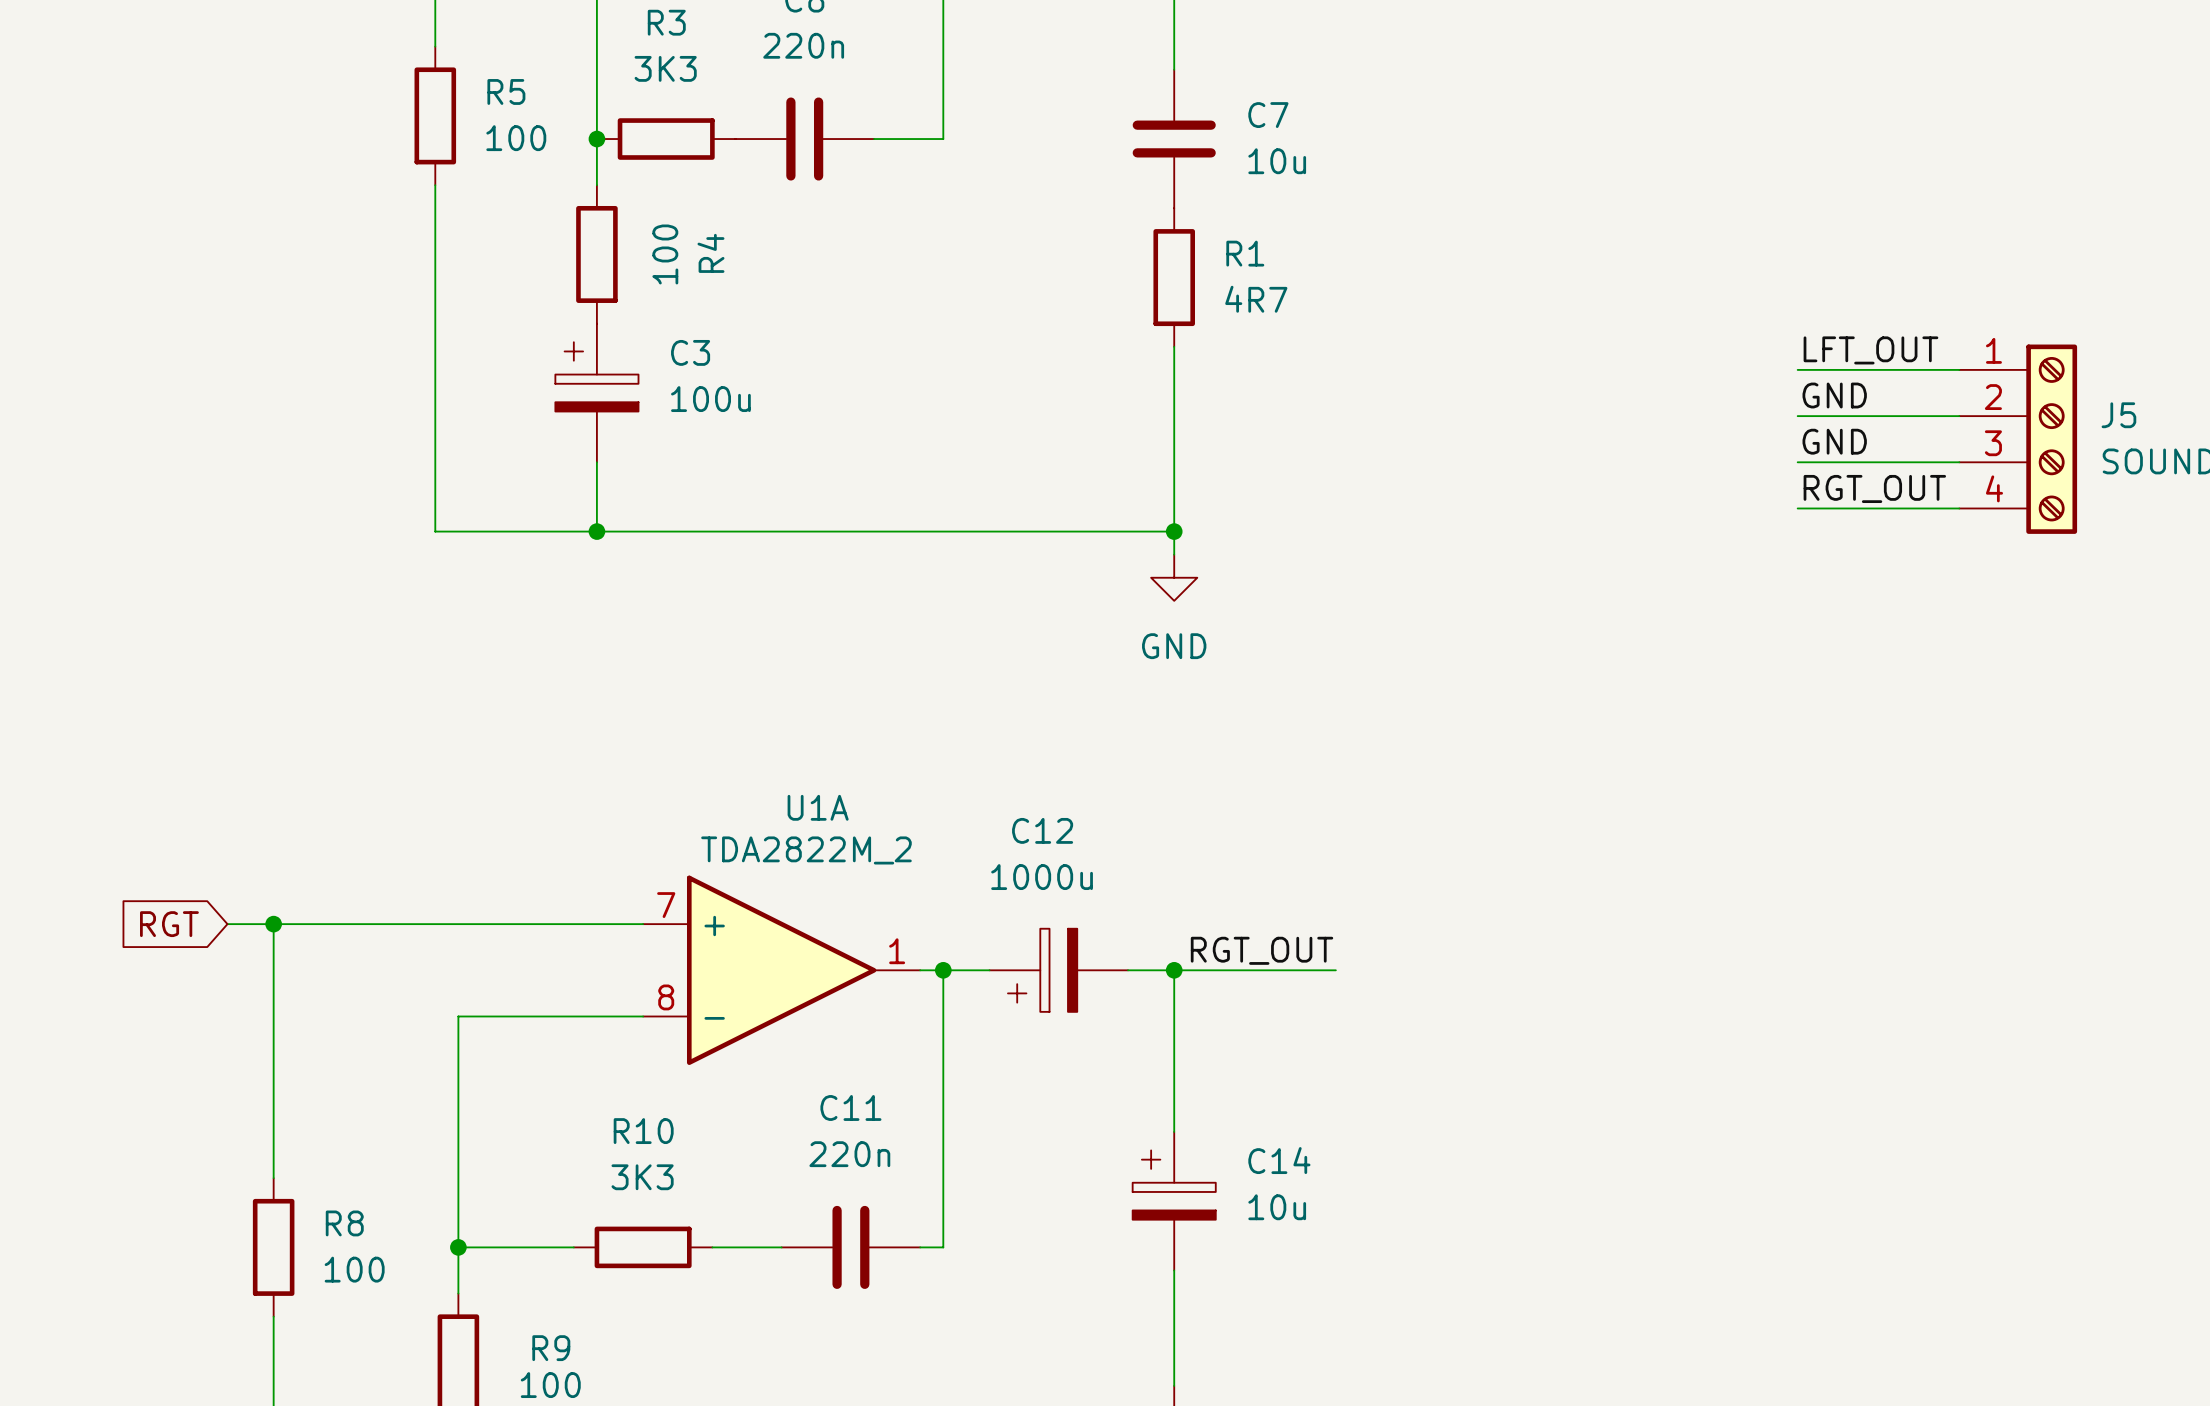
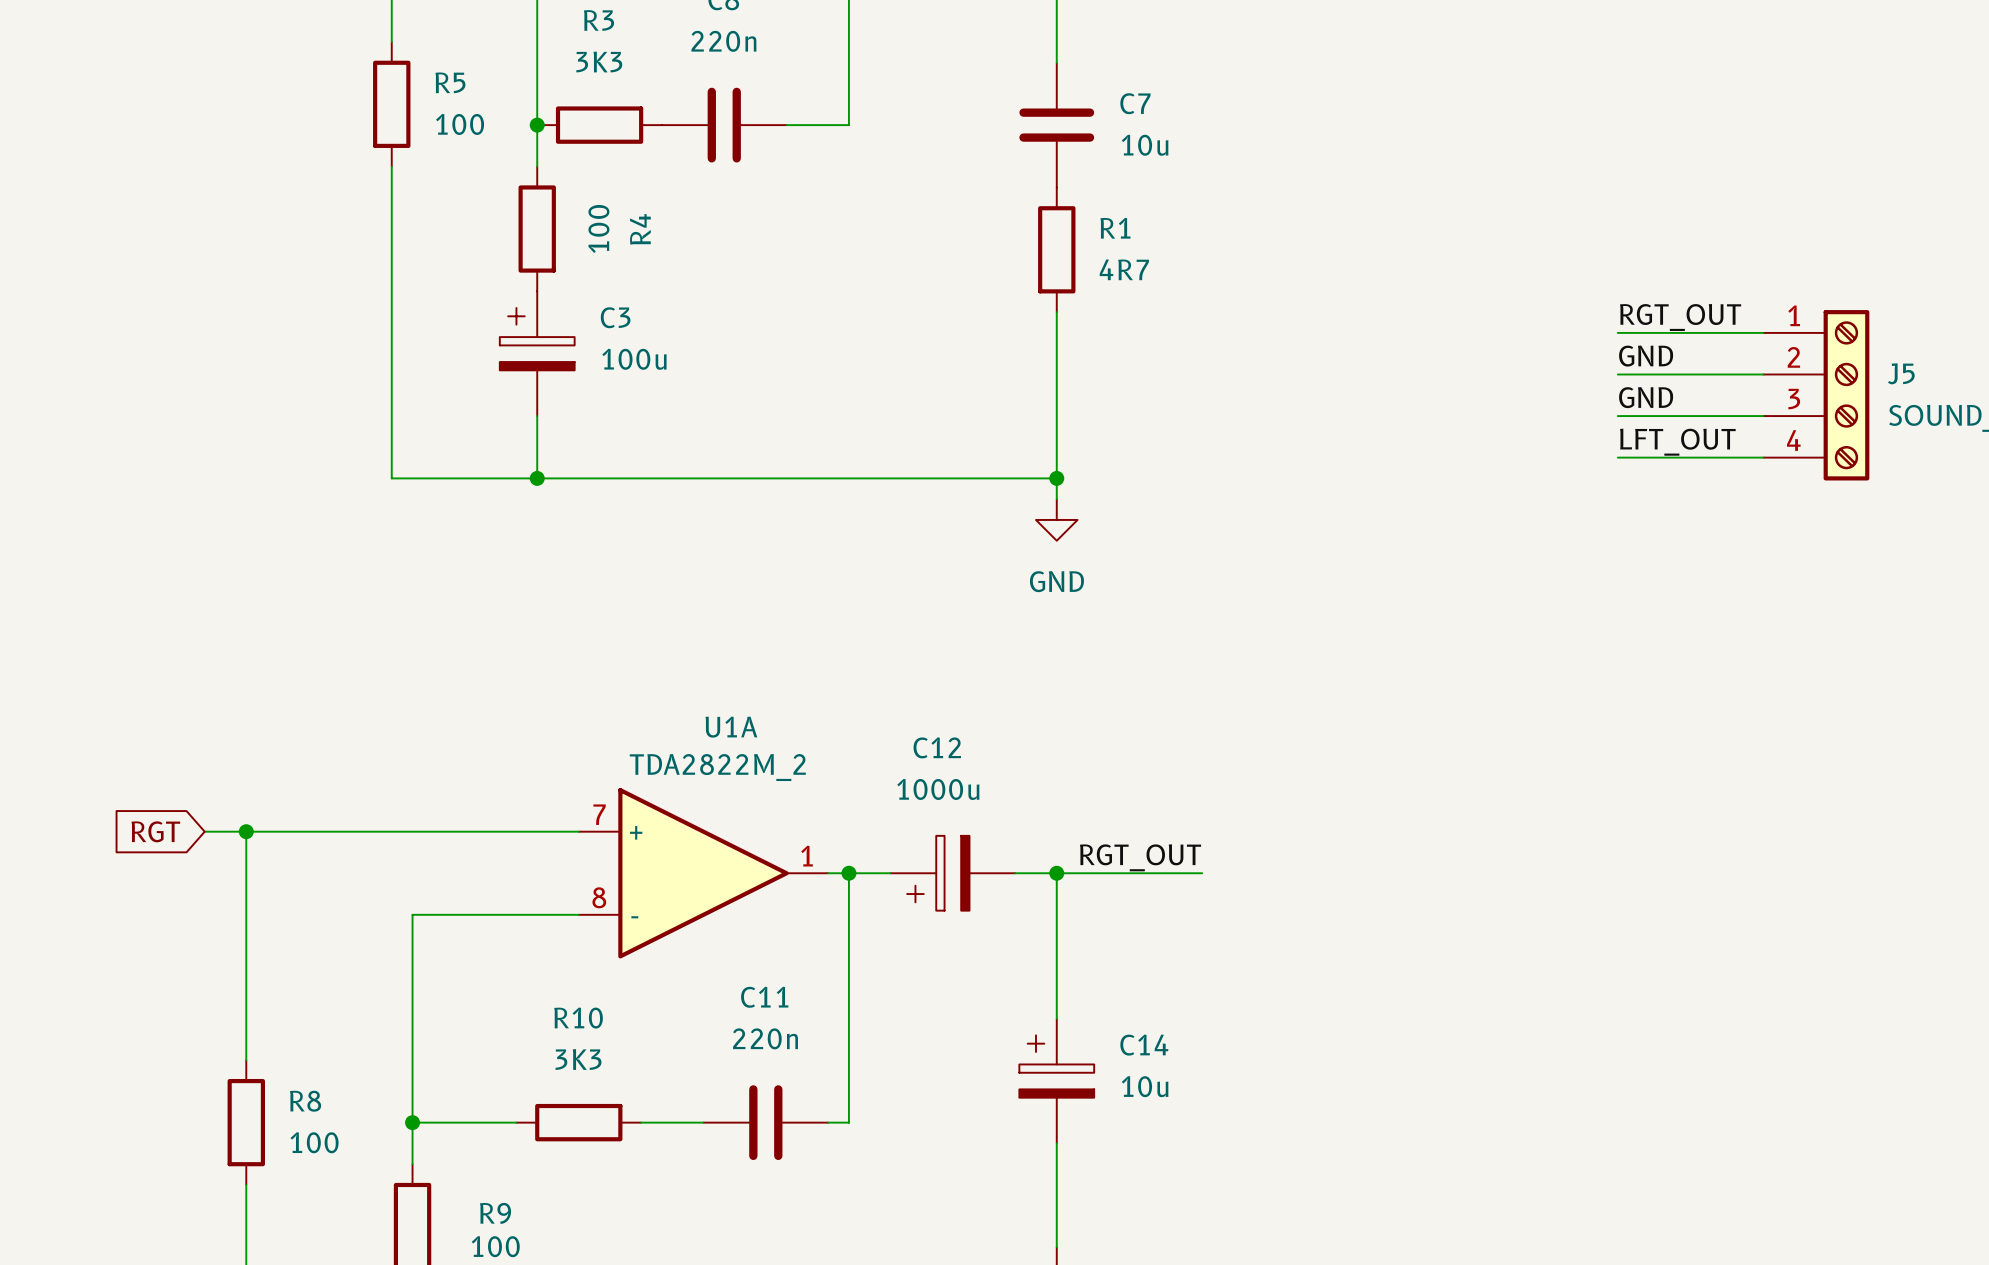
label: LFT_OUT (1870, 350) -> RGT_OUT (1680, 317)
label: RGT_OUT (1874, 488) -> LFT_OUT (1677, 442)

